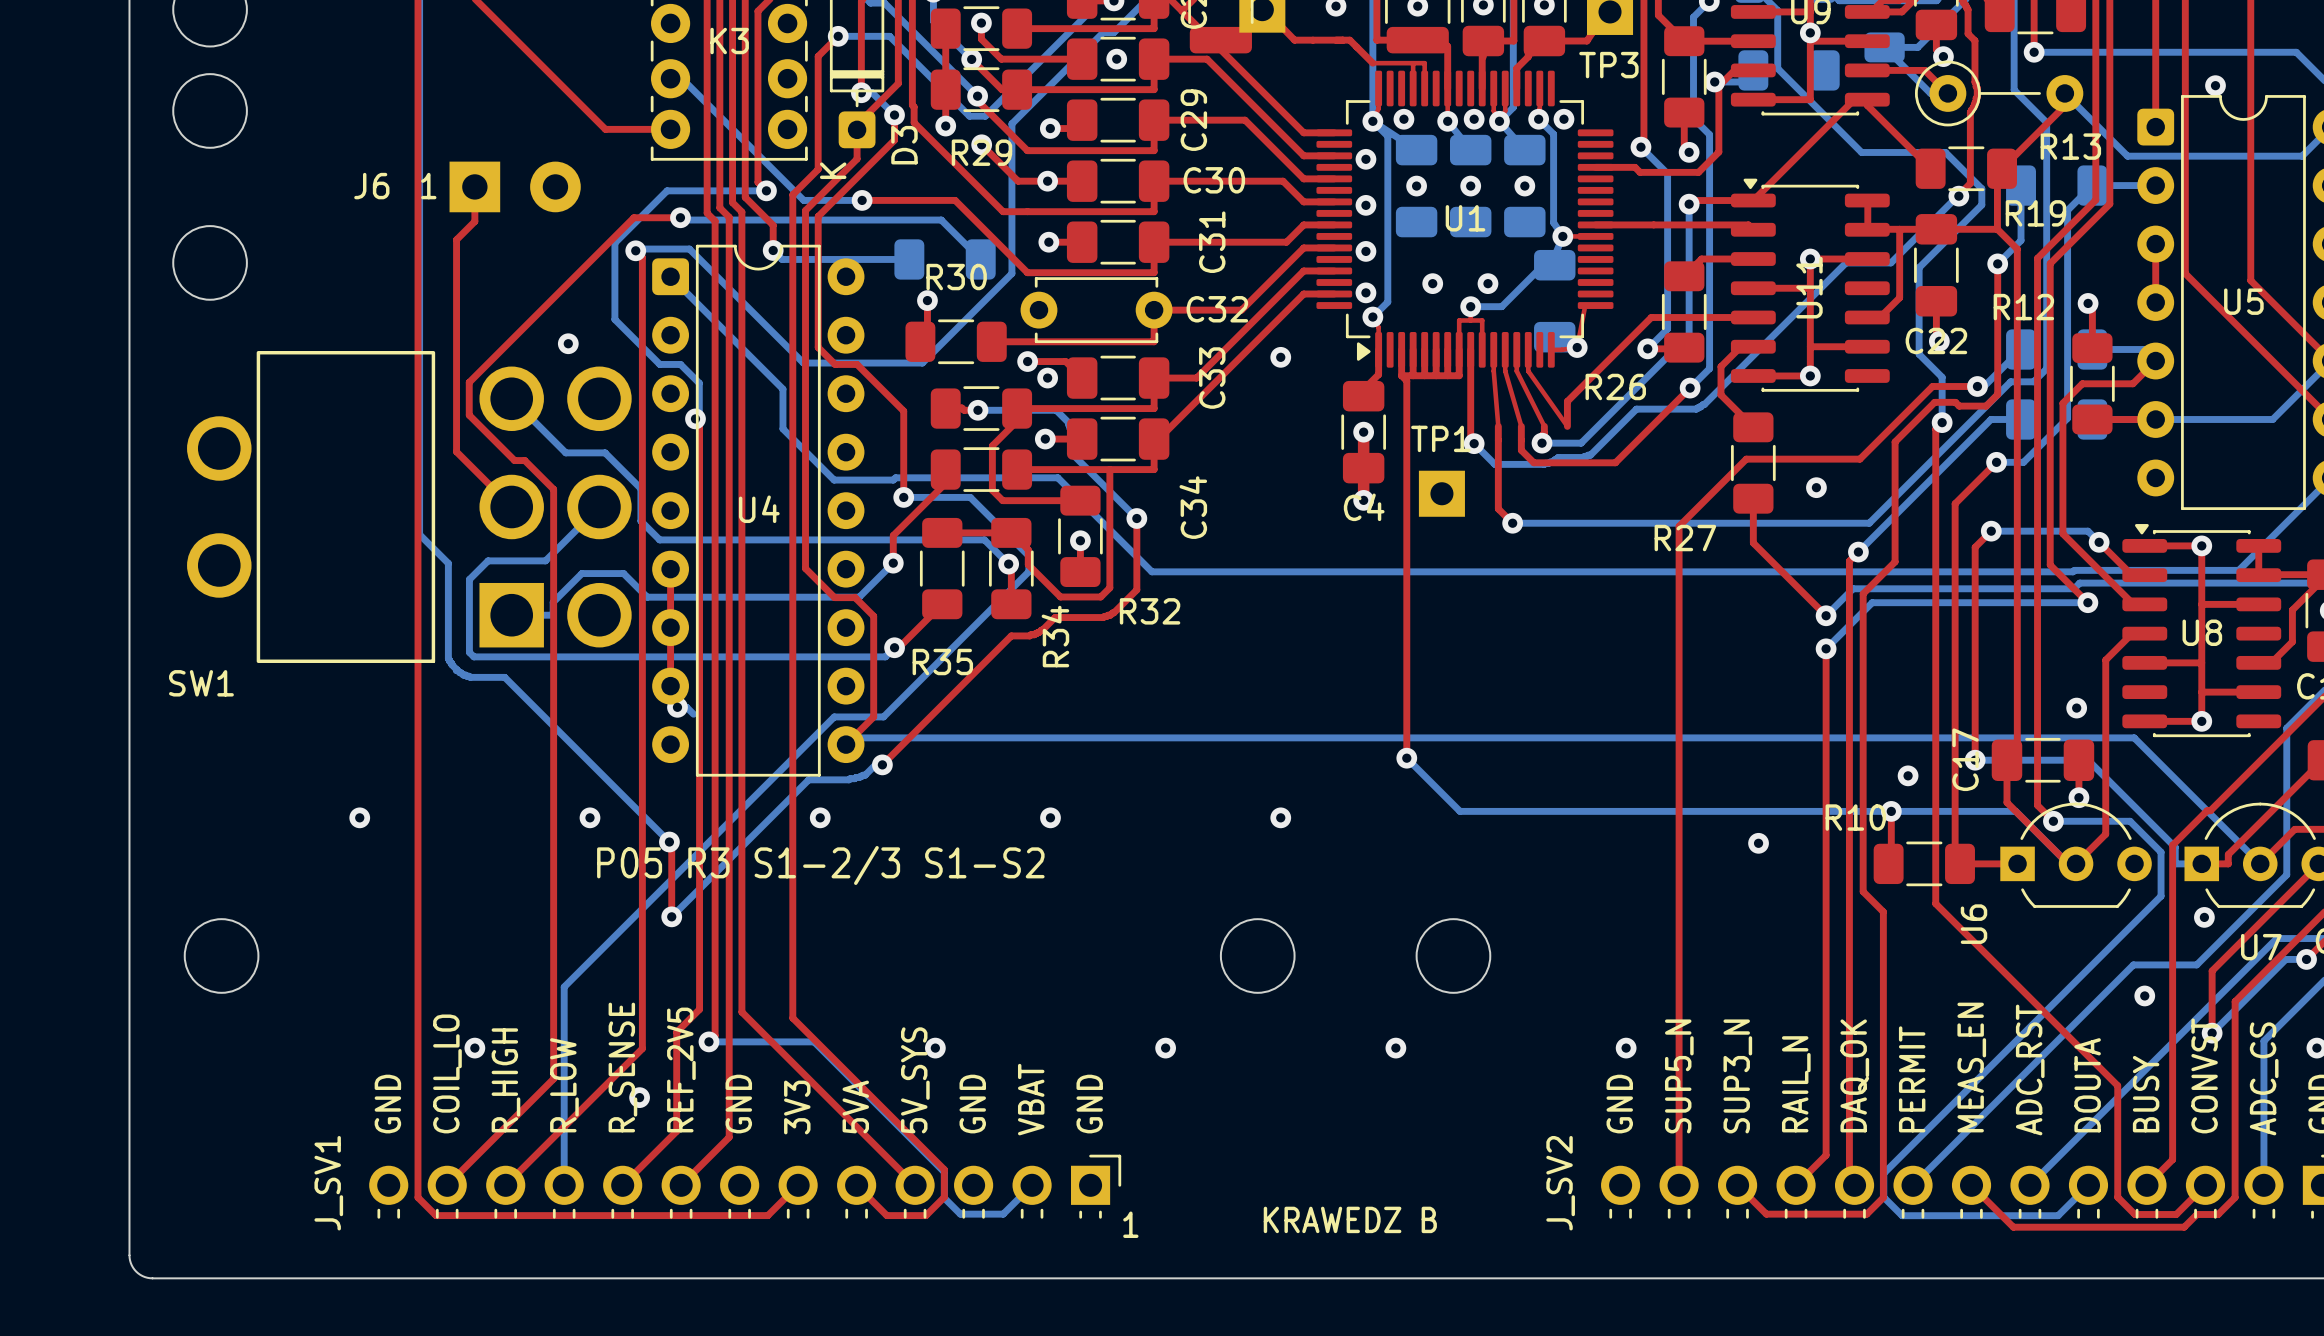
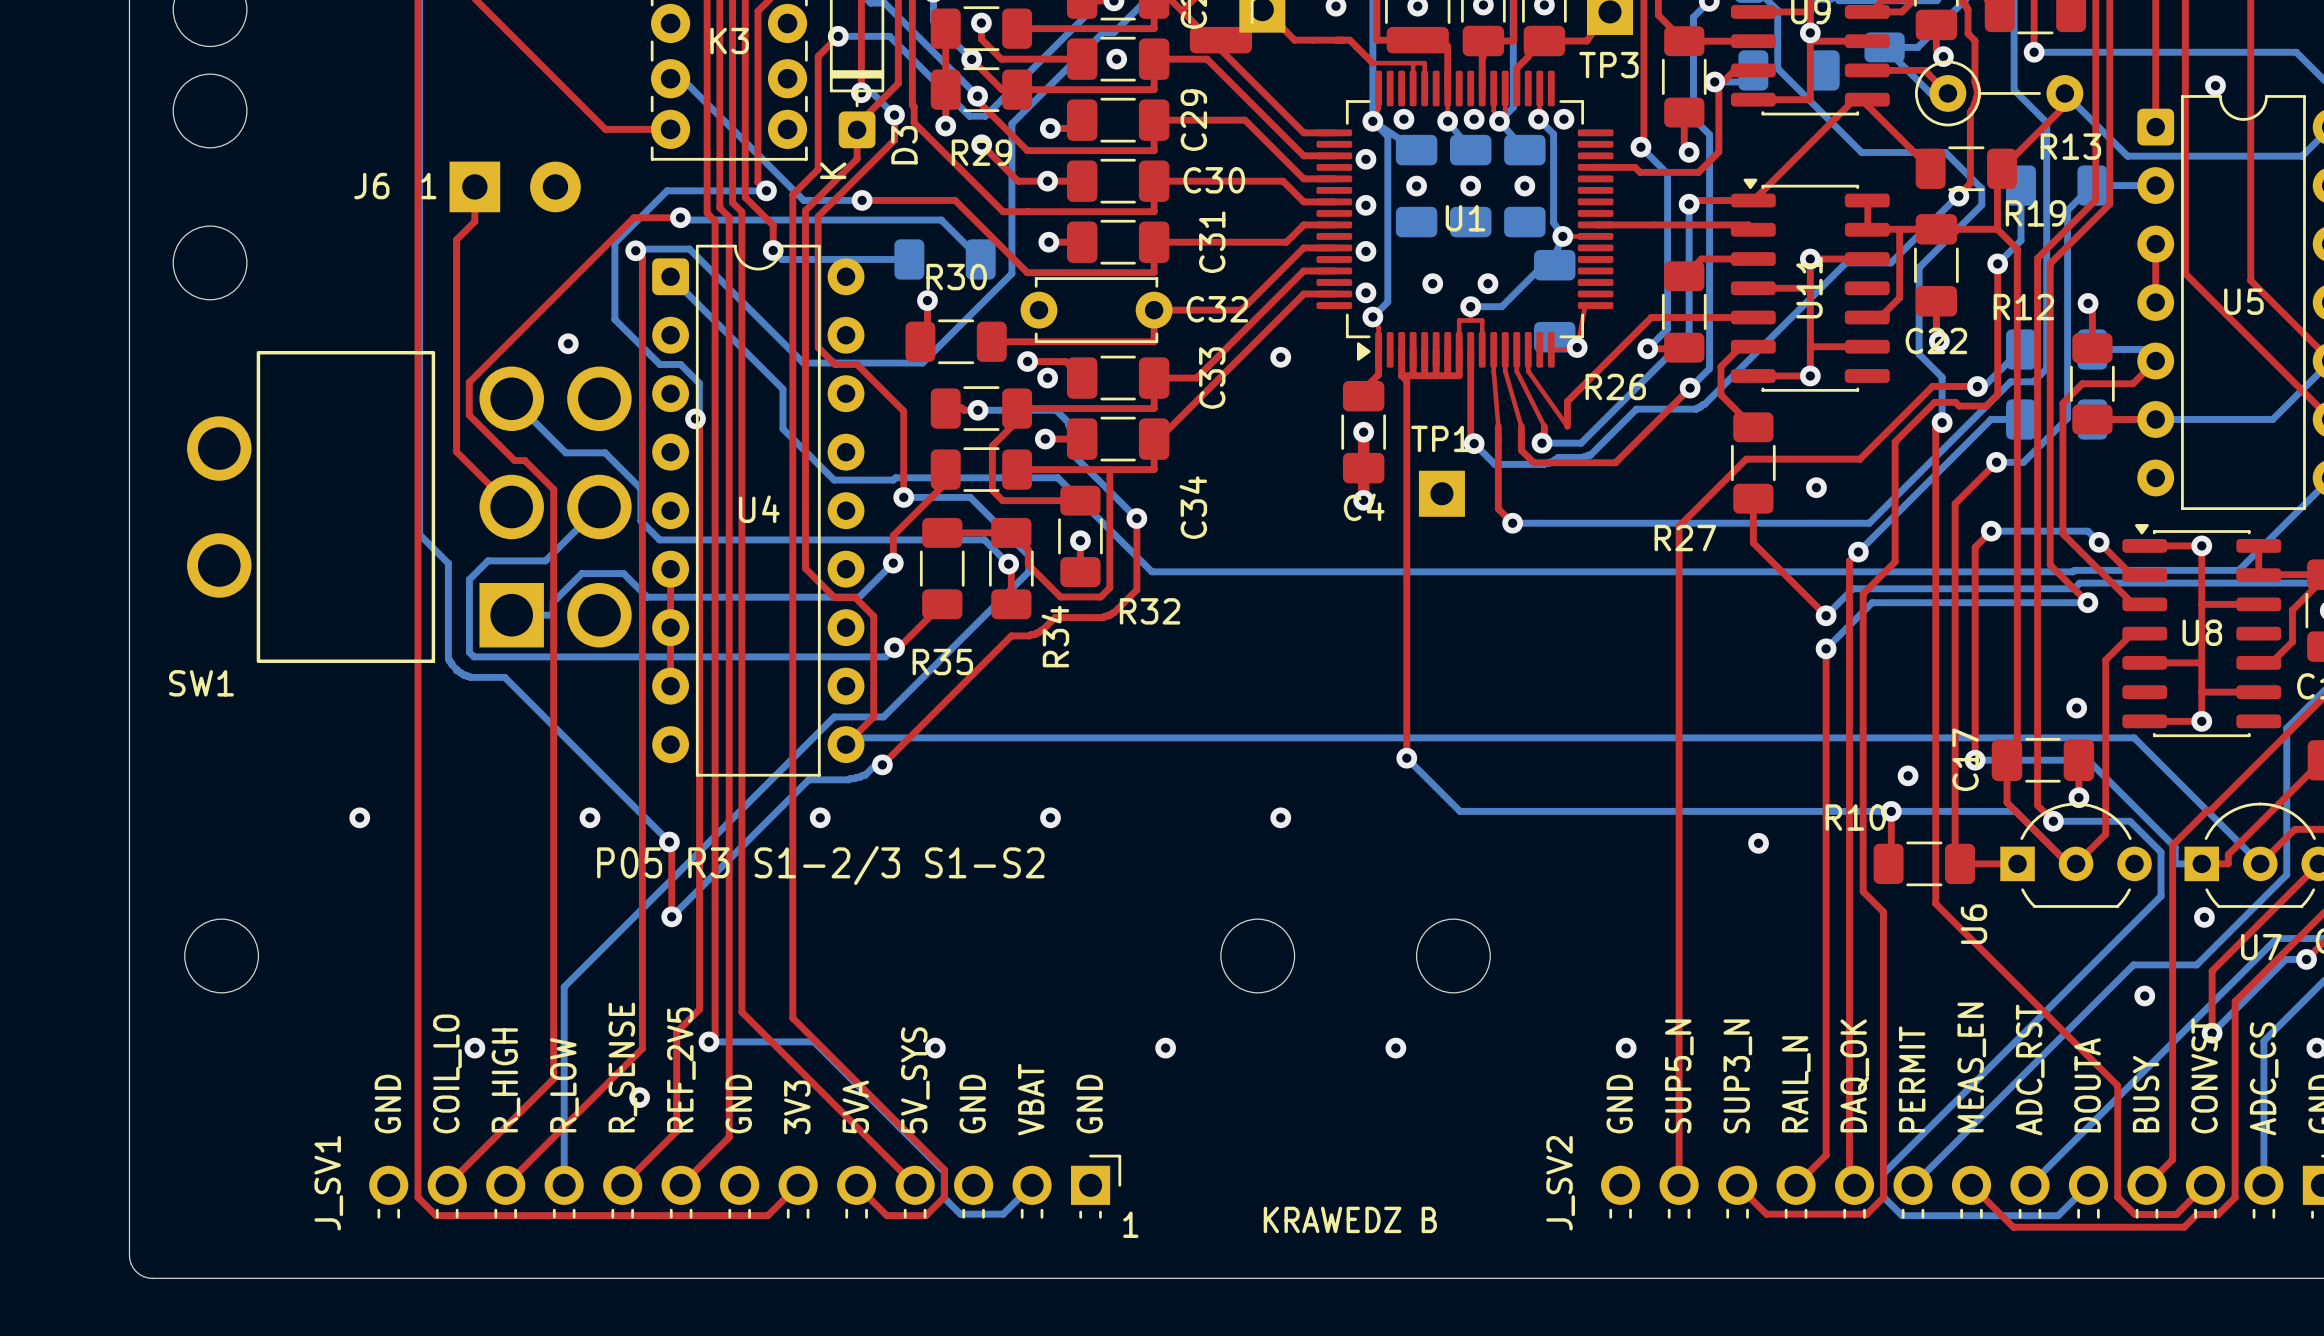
bottom track: (677, 707) (686, 707) (693, 714) -> none
via: (677, 707) -> none

